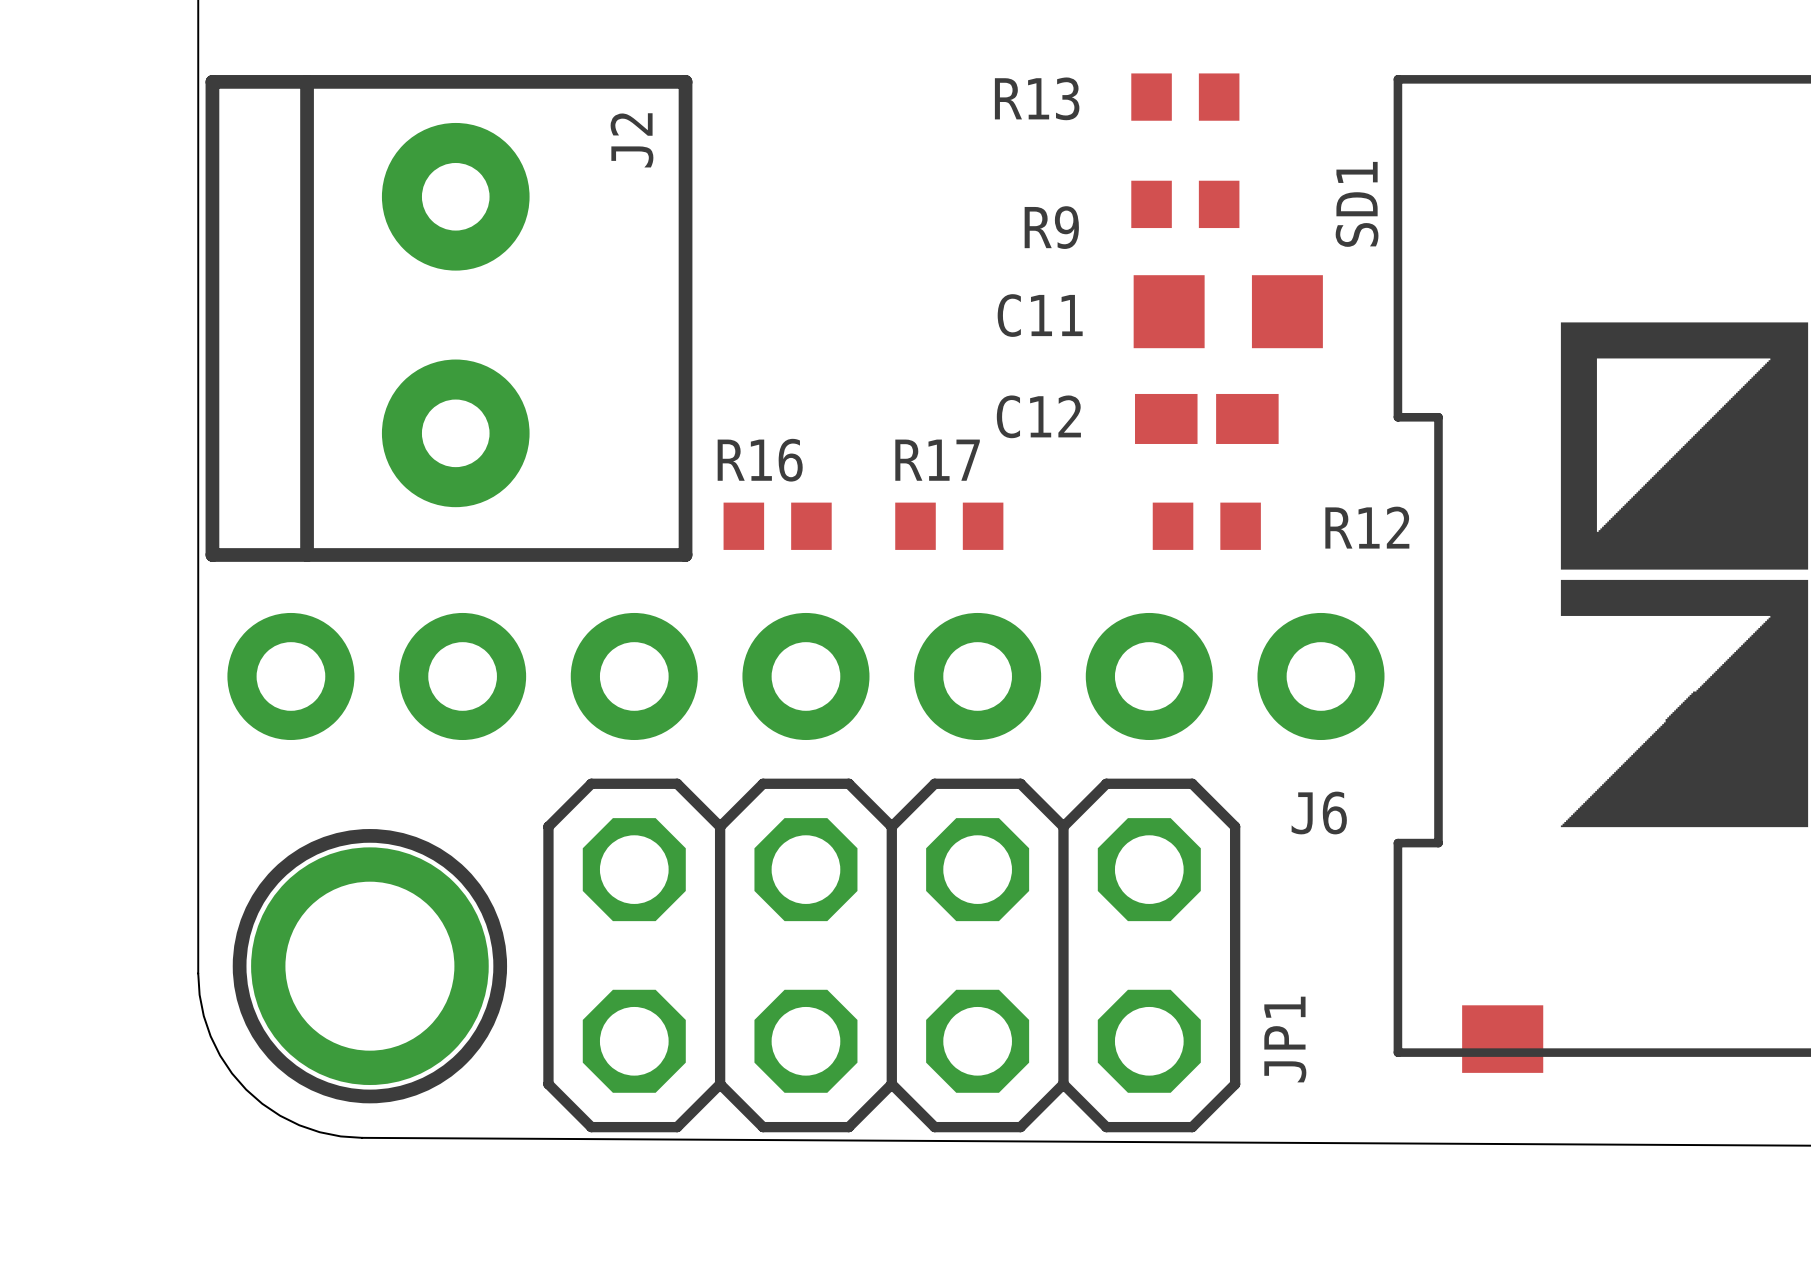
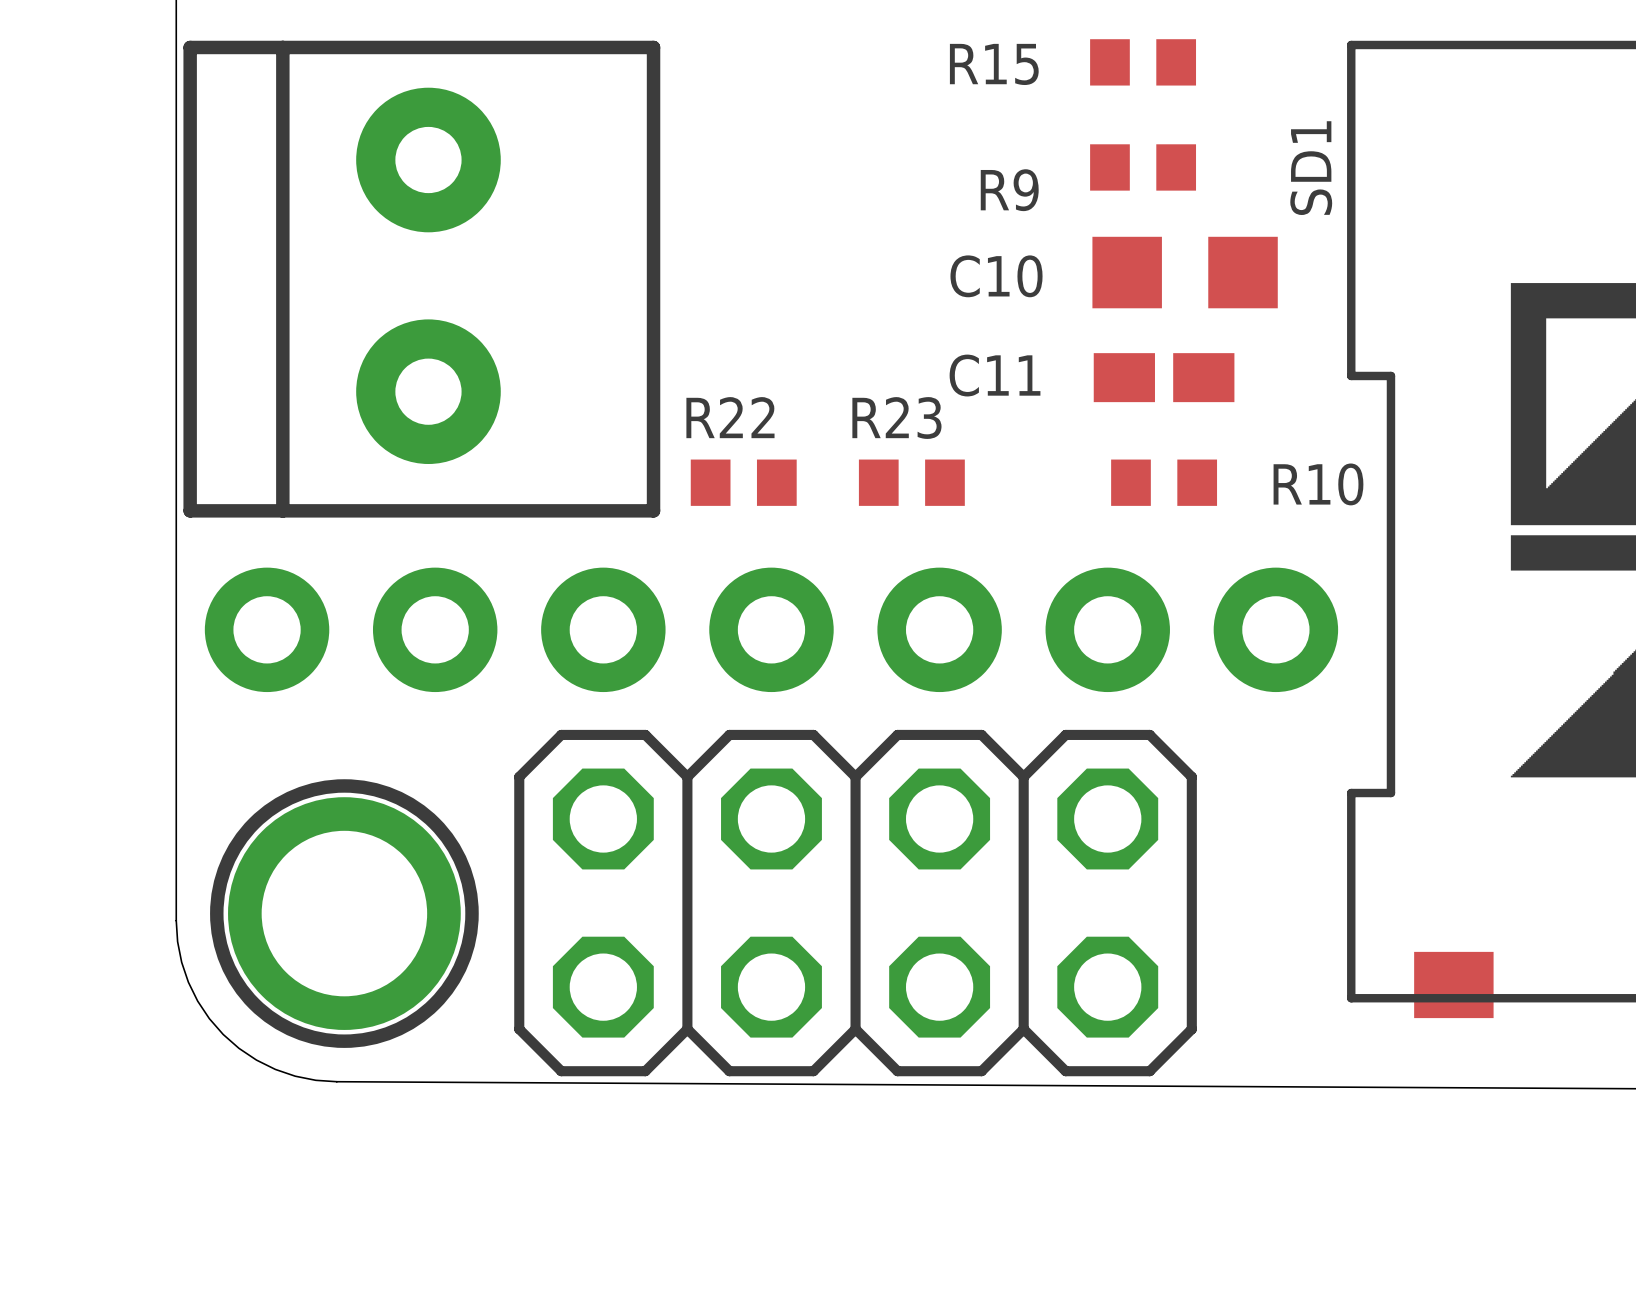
R13 name: R13 (1037, 98) -> R15 (994, 64)
J2 name: J2 (632, 140) -> none
C11 name: C11 (1040, 315) -> C10 (996, 276)
C12 name: C12 (1038, 416) -> C11 (995, 375)
R16 name: R16 (760, 460) -> R22 (730, 417)
R17 name: R17 (937, 460) -> R23 (896, 418)
R12 name: R12 (1367, 527) -> R10 (1318, 484)
J6 name: J6 (1319, 813) -> none
JP1 name: JP1 (1285, 1039) -> none

